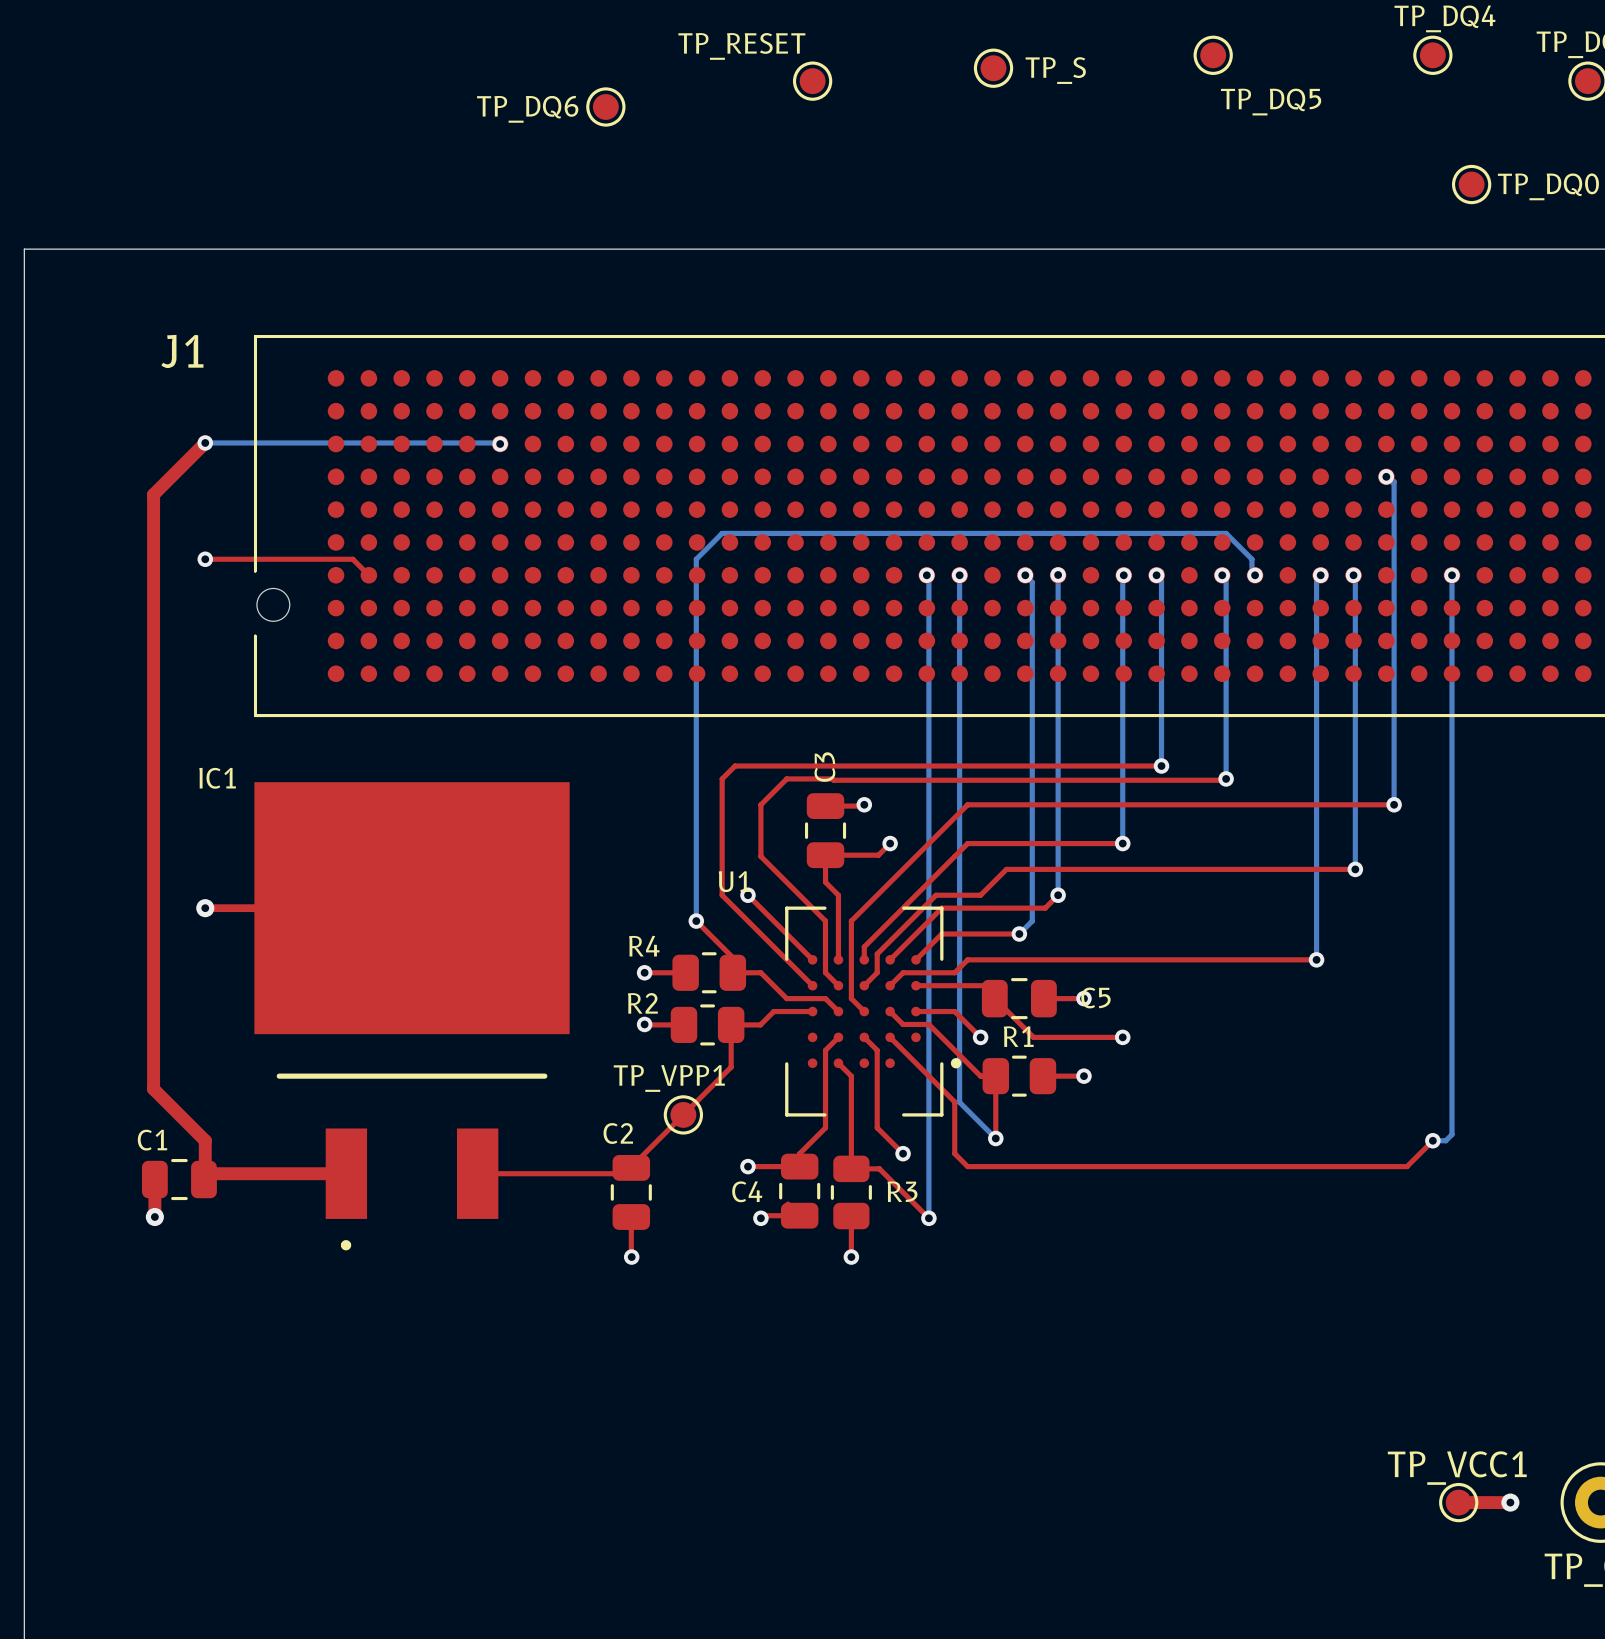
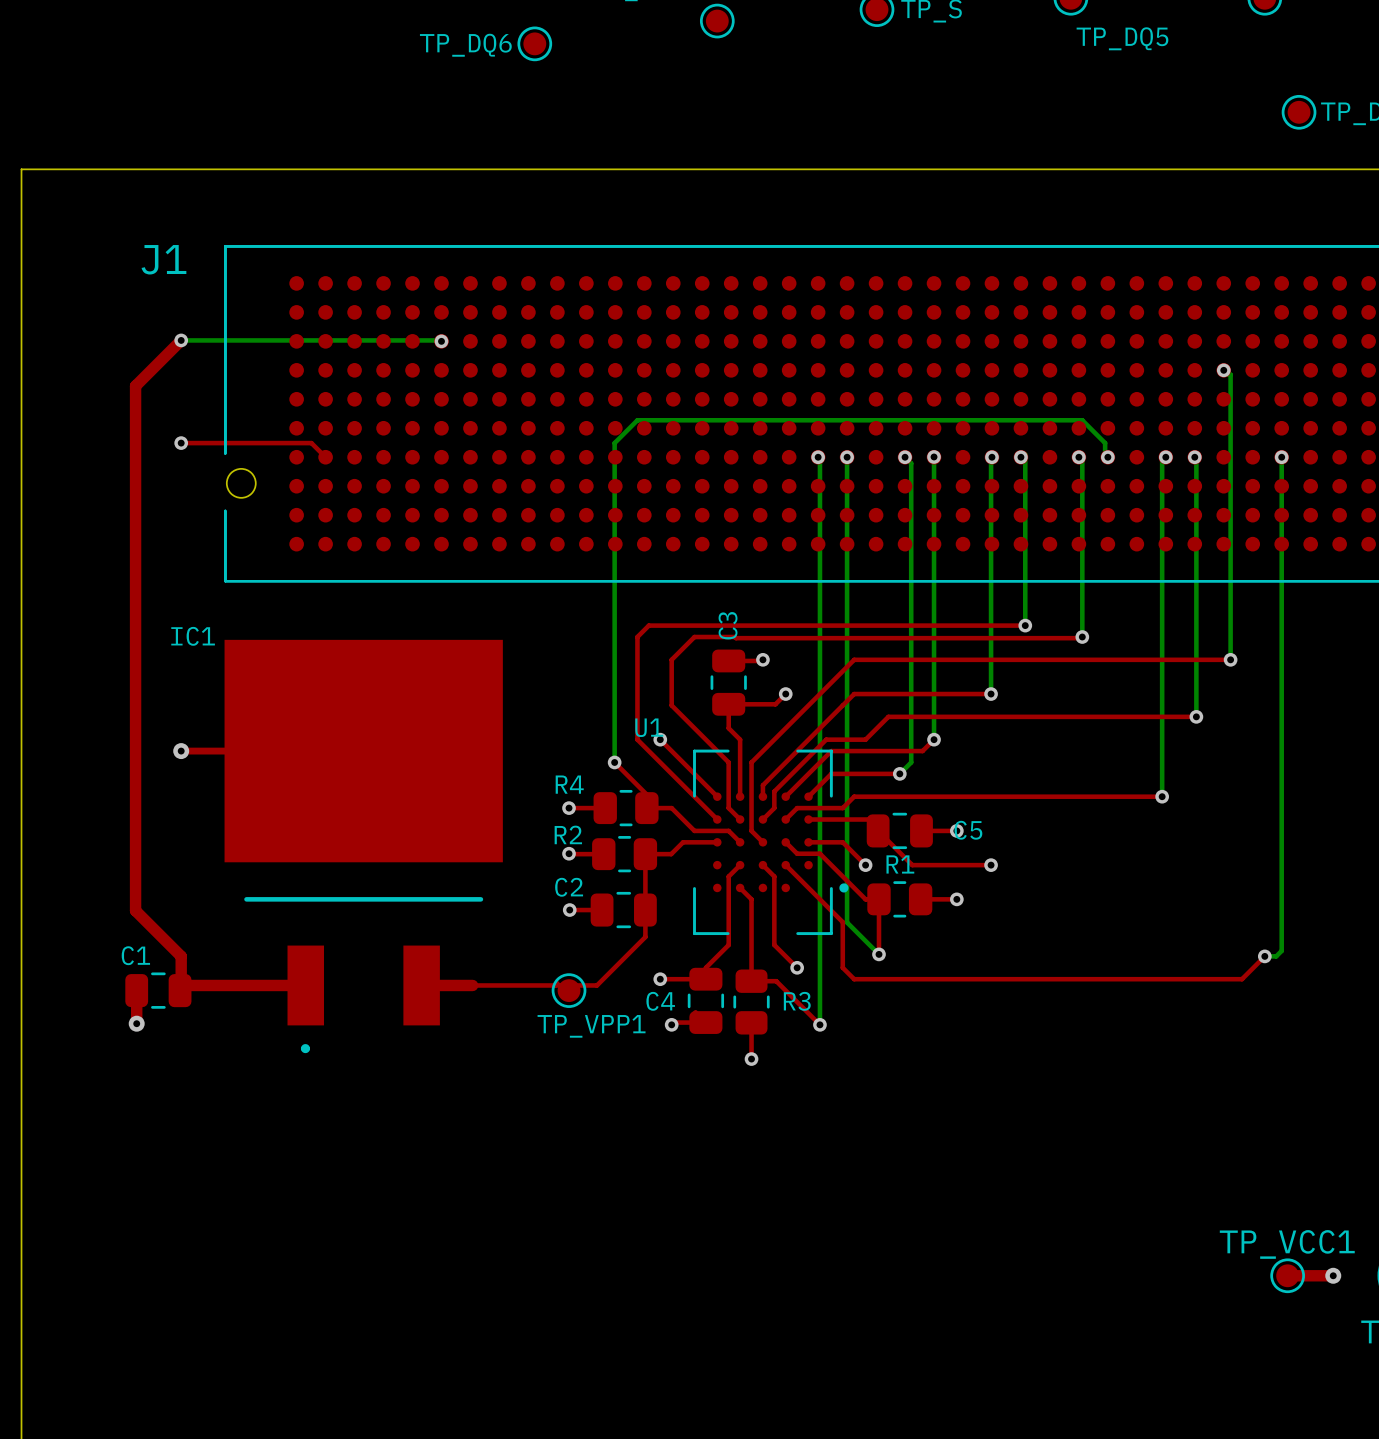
top track: (731, 1067) (625, 1173) -> (645, 891) (645, 937) (596, 985) (552, 985)
TP_VPP1 name position: TP_VPP1 (669, 1078) -> TP_VPP1 (591, 1026)
via: none -> (569, 910)
top track: none -> (602, 910) (569, 910)
TP_VPP1 position: (683, 1114) -> (569, 990)
C2 name position: C2 (618, 1133) -> C2 (569, 887)
top track width: thin (477, 1173) (535, 1173) -> thick (421, 985) (472, 985)
C2 rotation: 0° (631, 1192) -> 90° clockwise (623, 910)
C2 position: (631, 1192) -> (623, 910)
top track: (631, 1217) (631, 1257) -> none
via: (631, 1257) -> none

